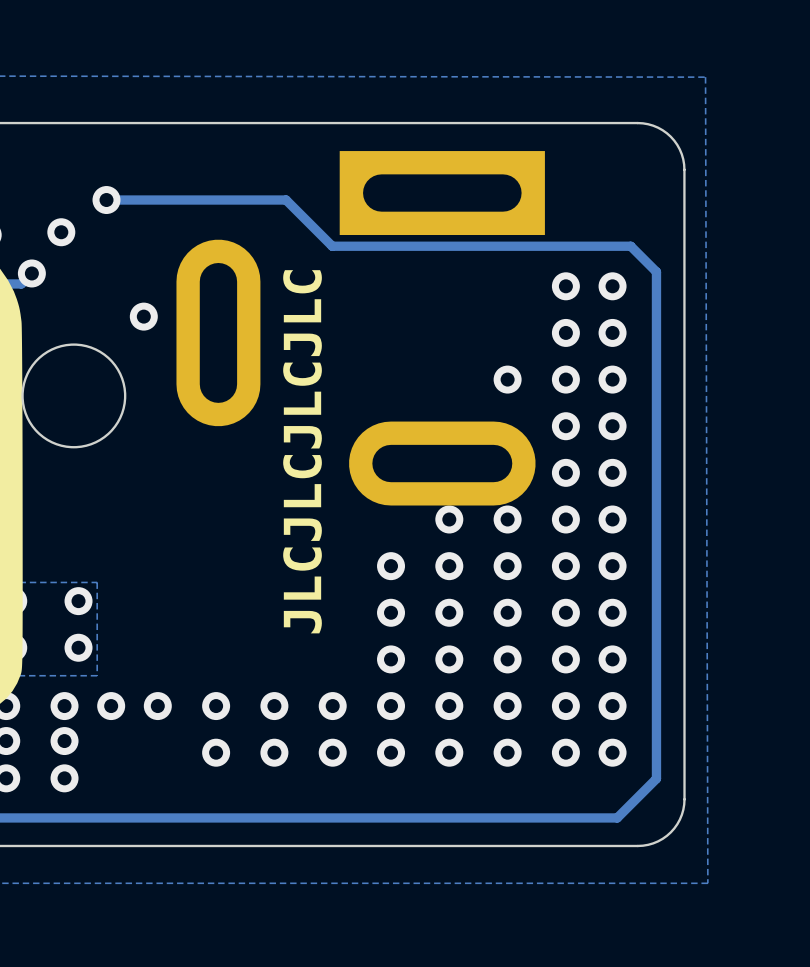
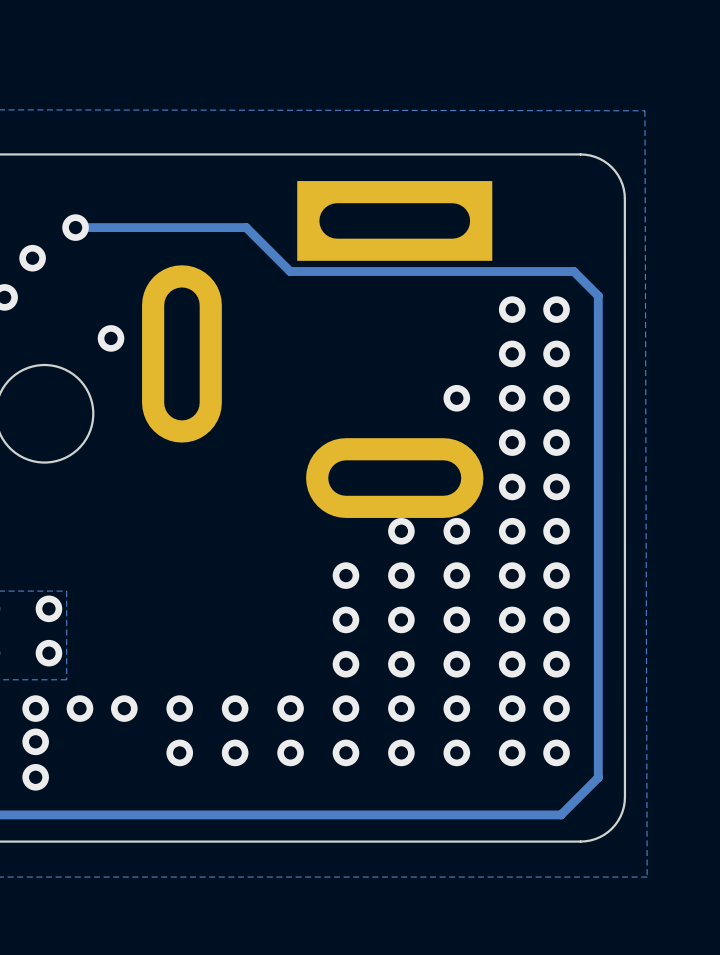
text: JLCJLCJLCJLC (302, 451) -> none

